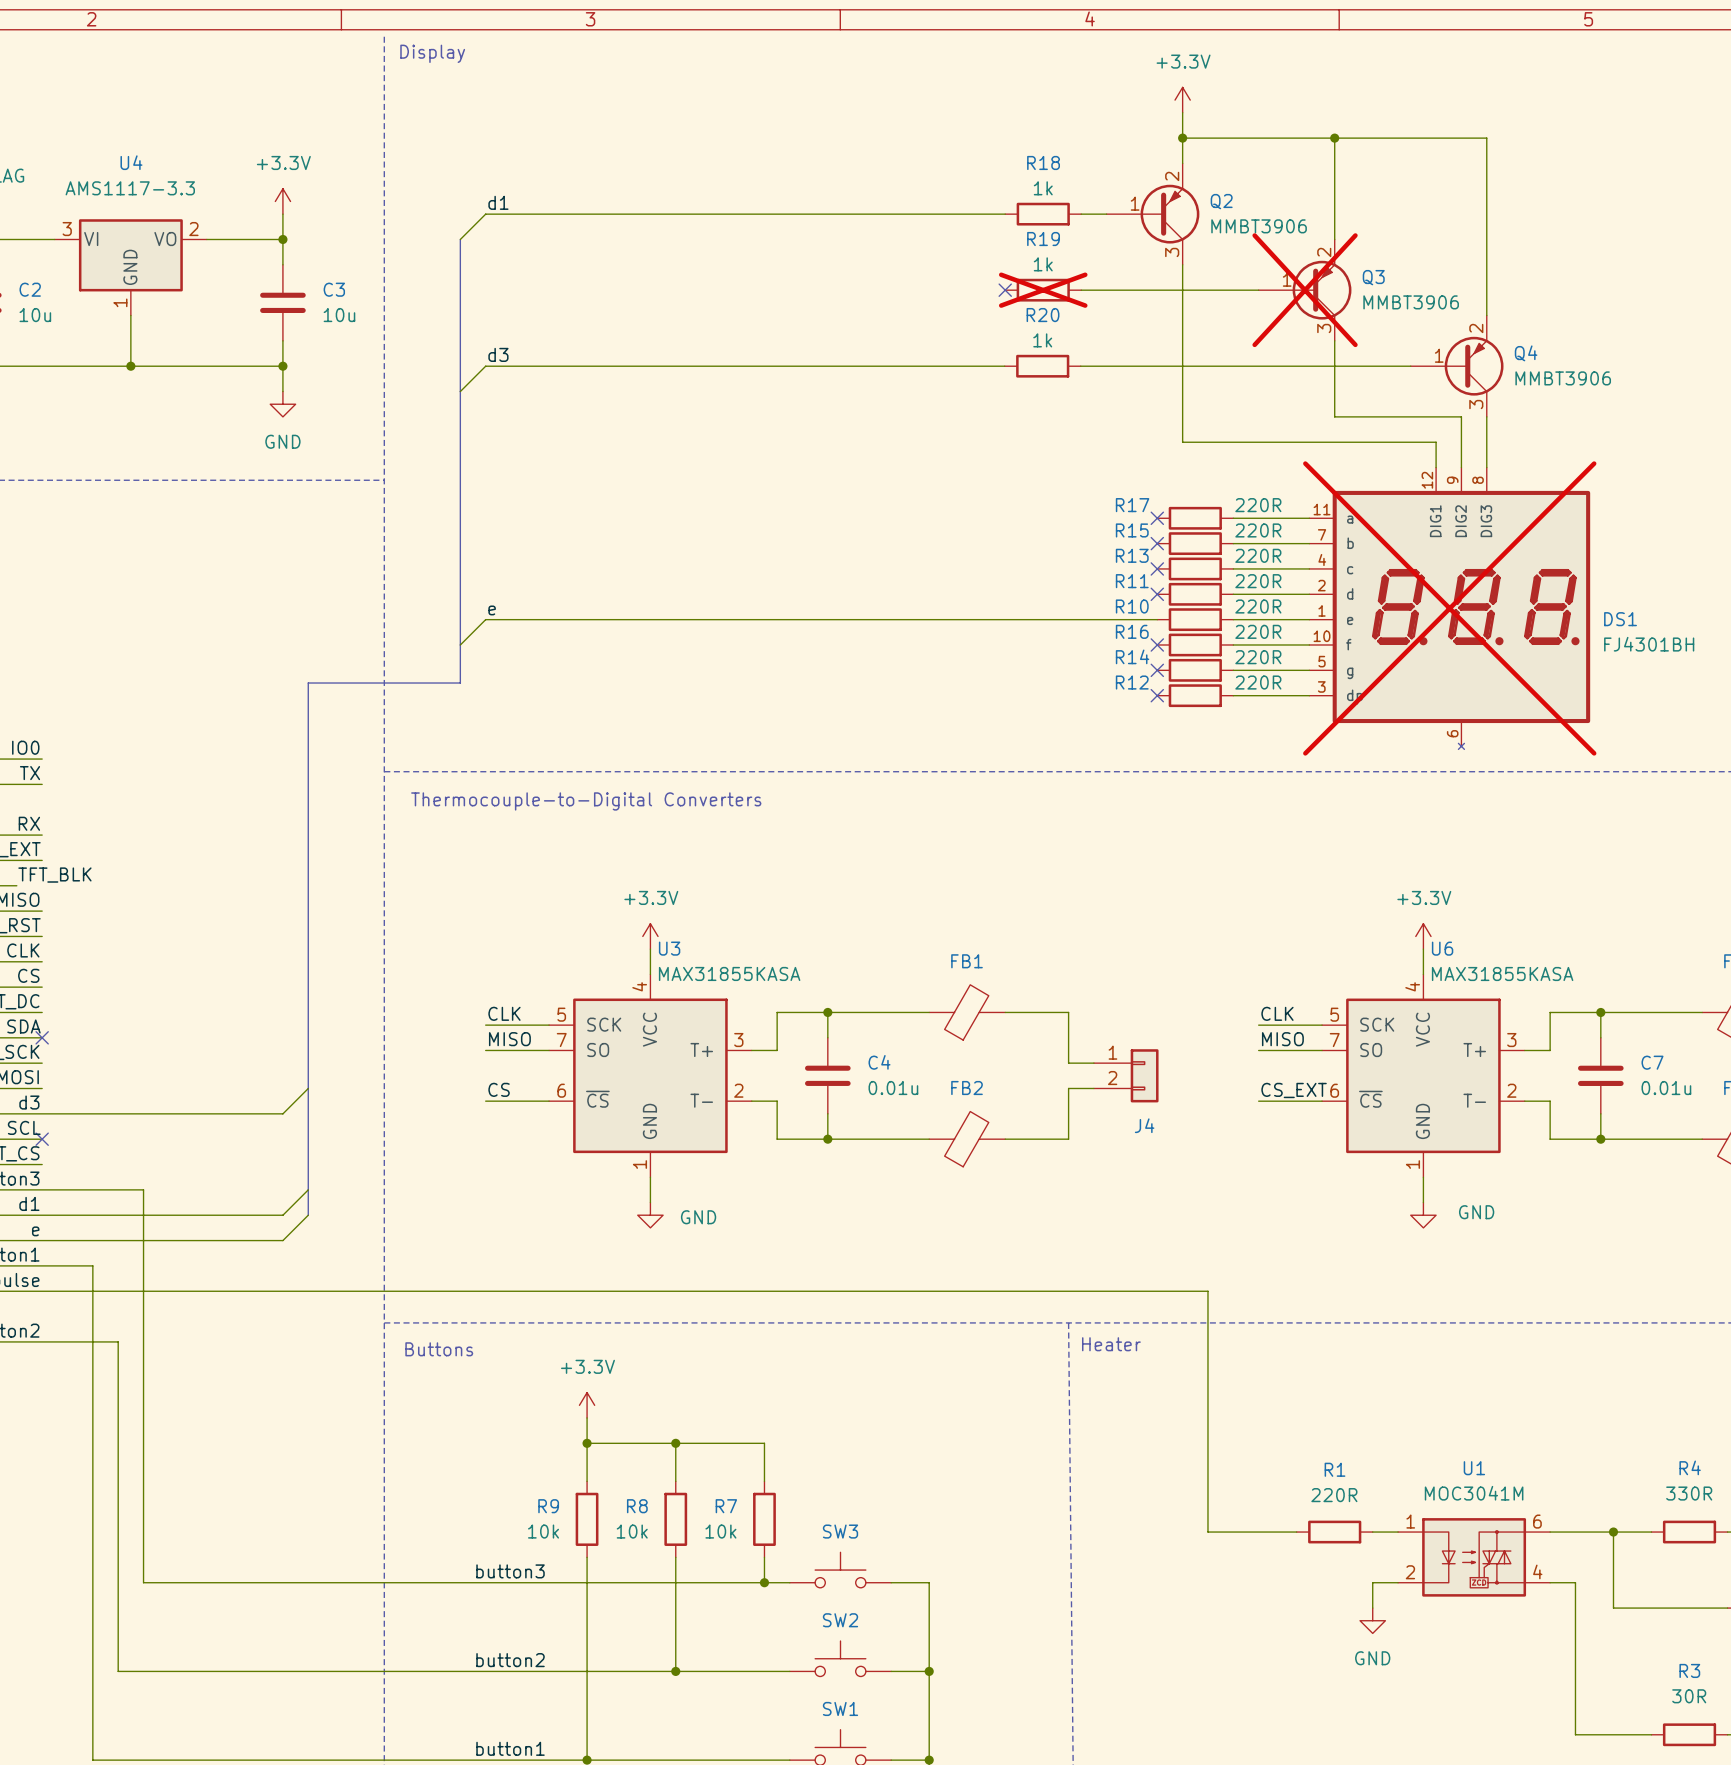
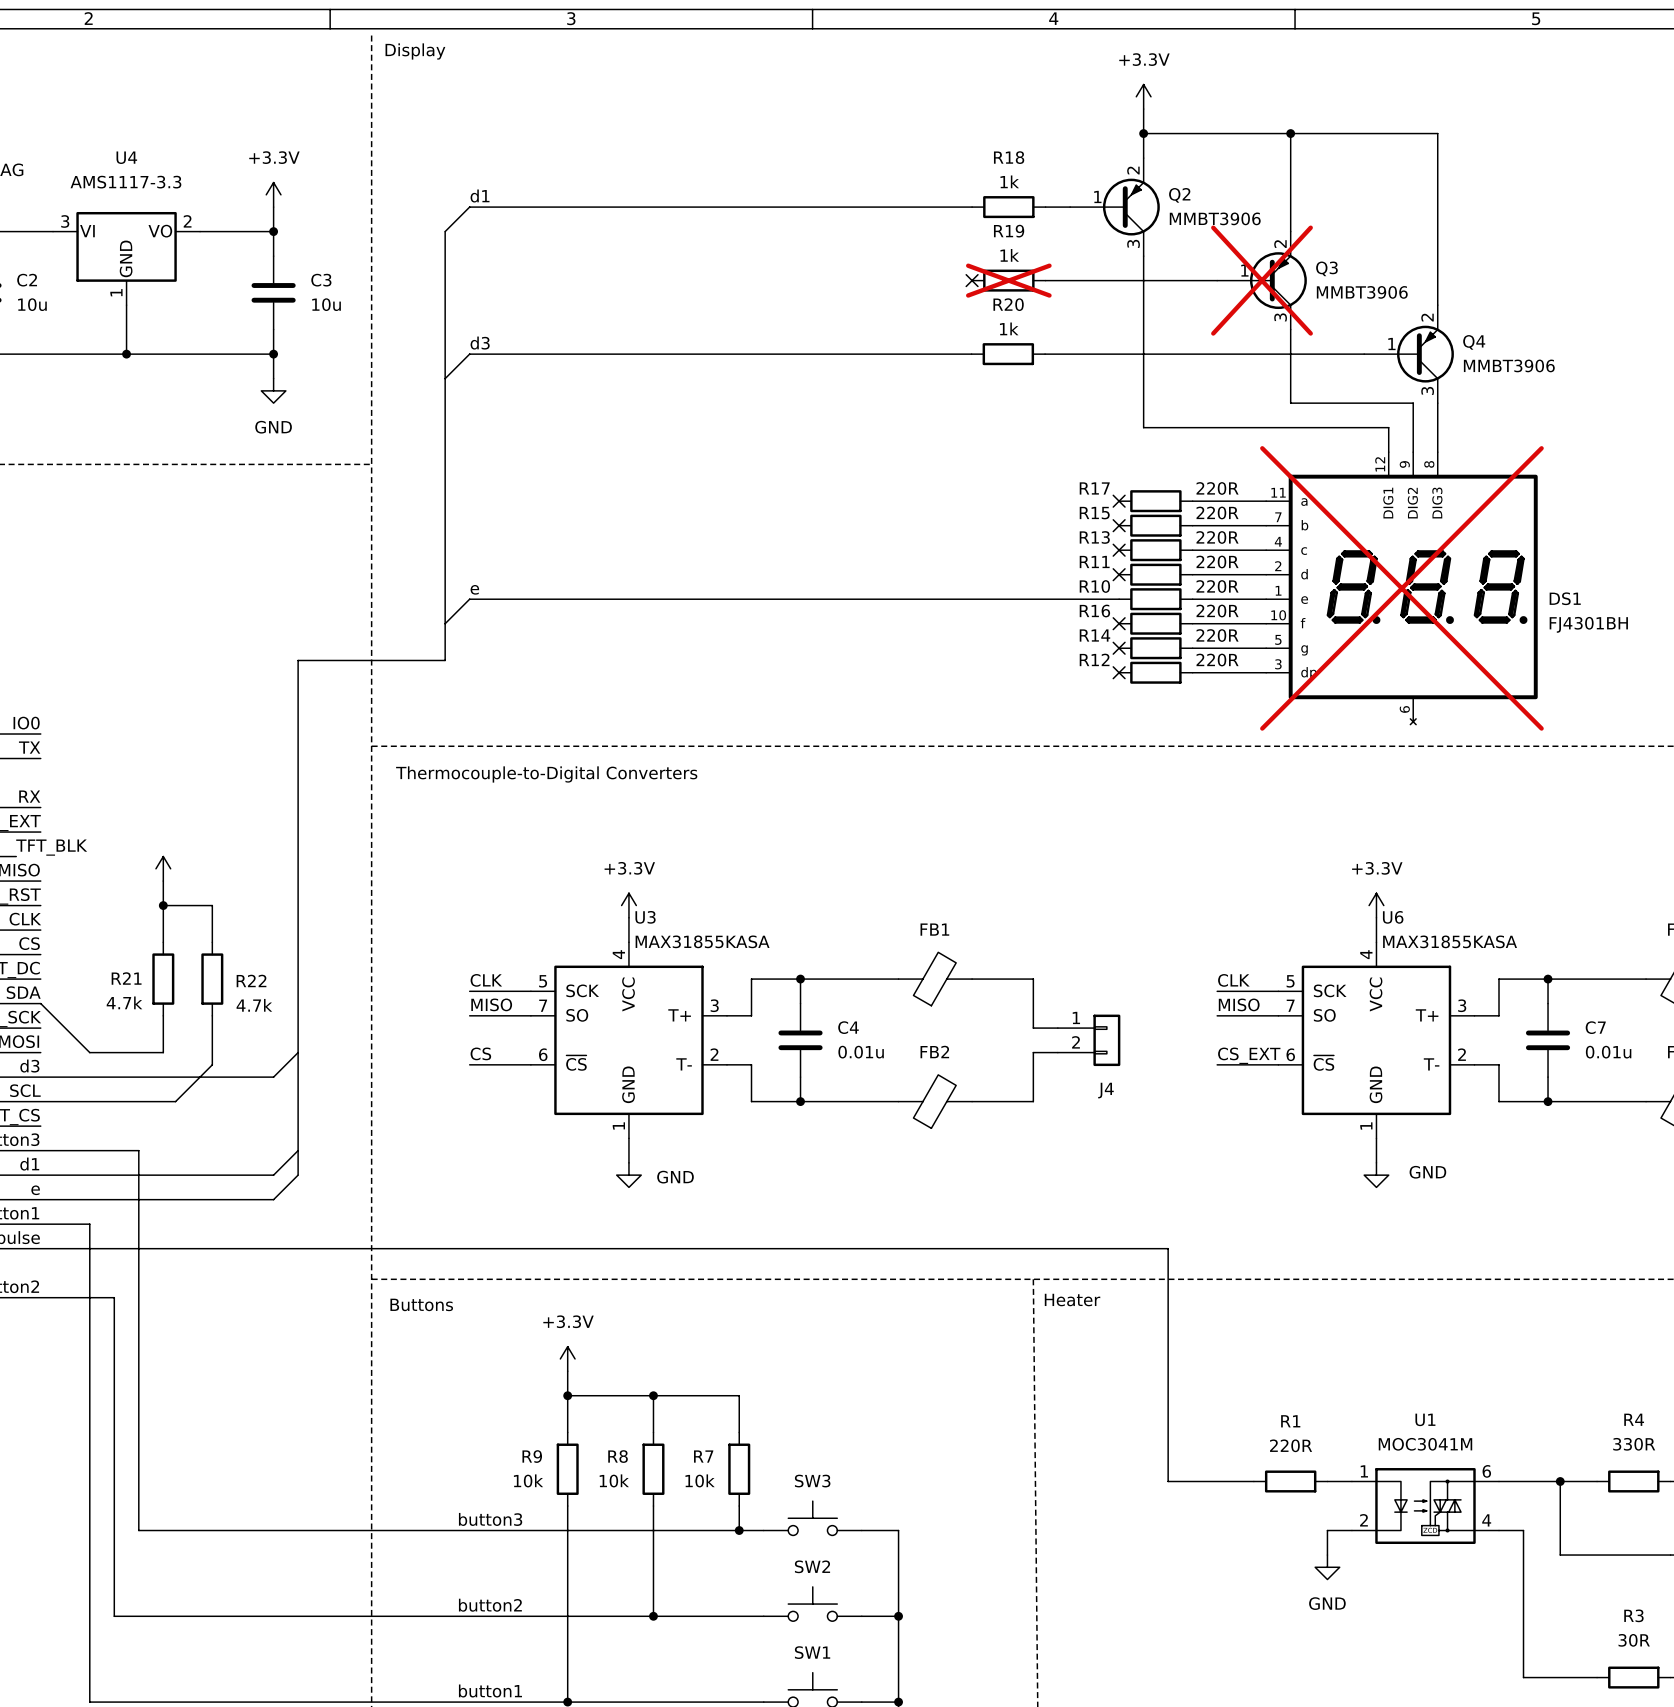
power symbol: none -> (163, 868)
wire: none -> (163, 881) (163, 942)
wire: none -> (163, 905) (212, 905) (212, 942)
junction: none -> (163, 905)
R21: none -> 4.7k (163, 979)
R22: none -> 4.7k (212, 979)
wire: none -> (40, 1003) (89, 1052) (163, 1052) (163, 1015)
no-connect mark: (42, 1037) -> none
wire: none -> (212, 1015) (212, 1064) (175, 1101) (40, 1101)
no-connect mark: (42, 1139) -> none

